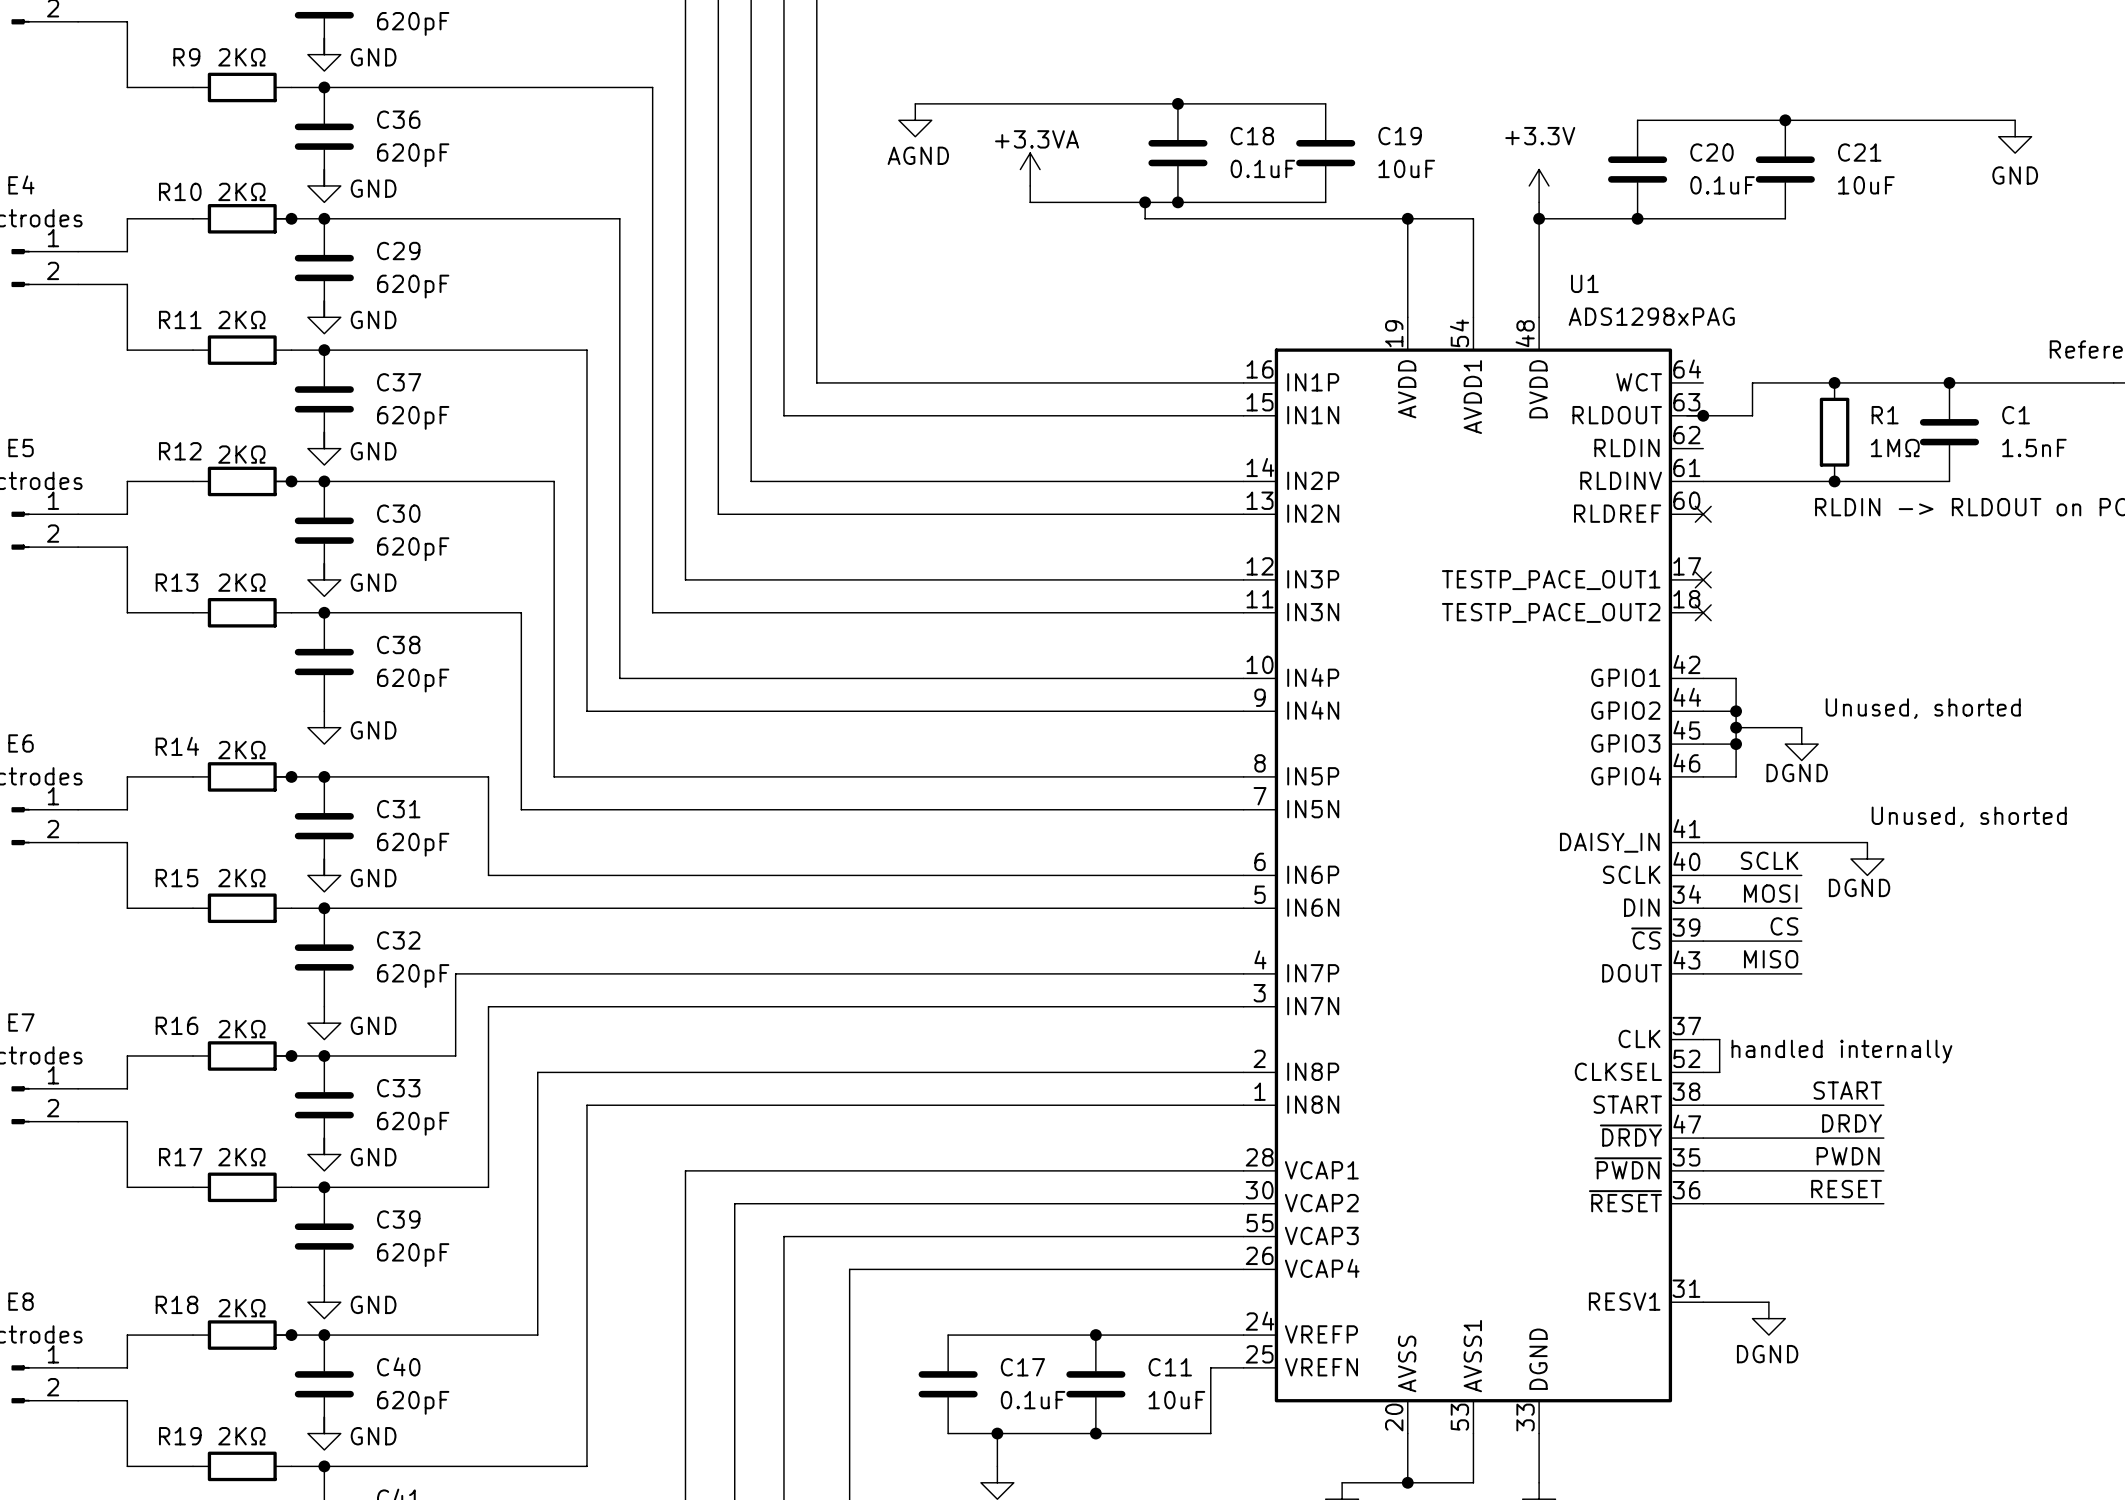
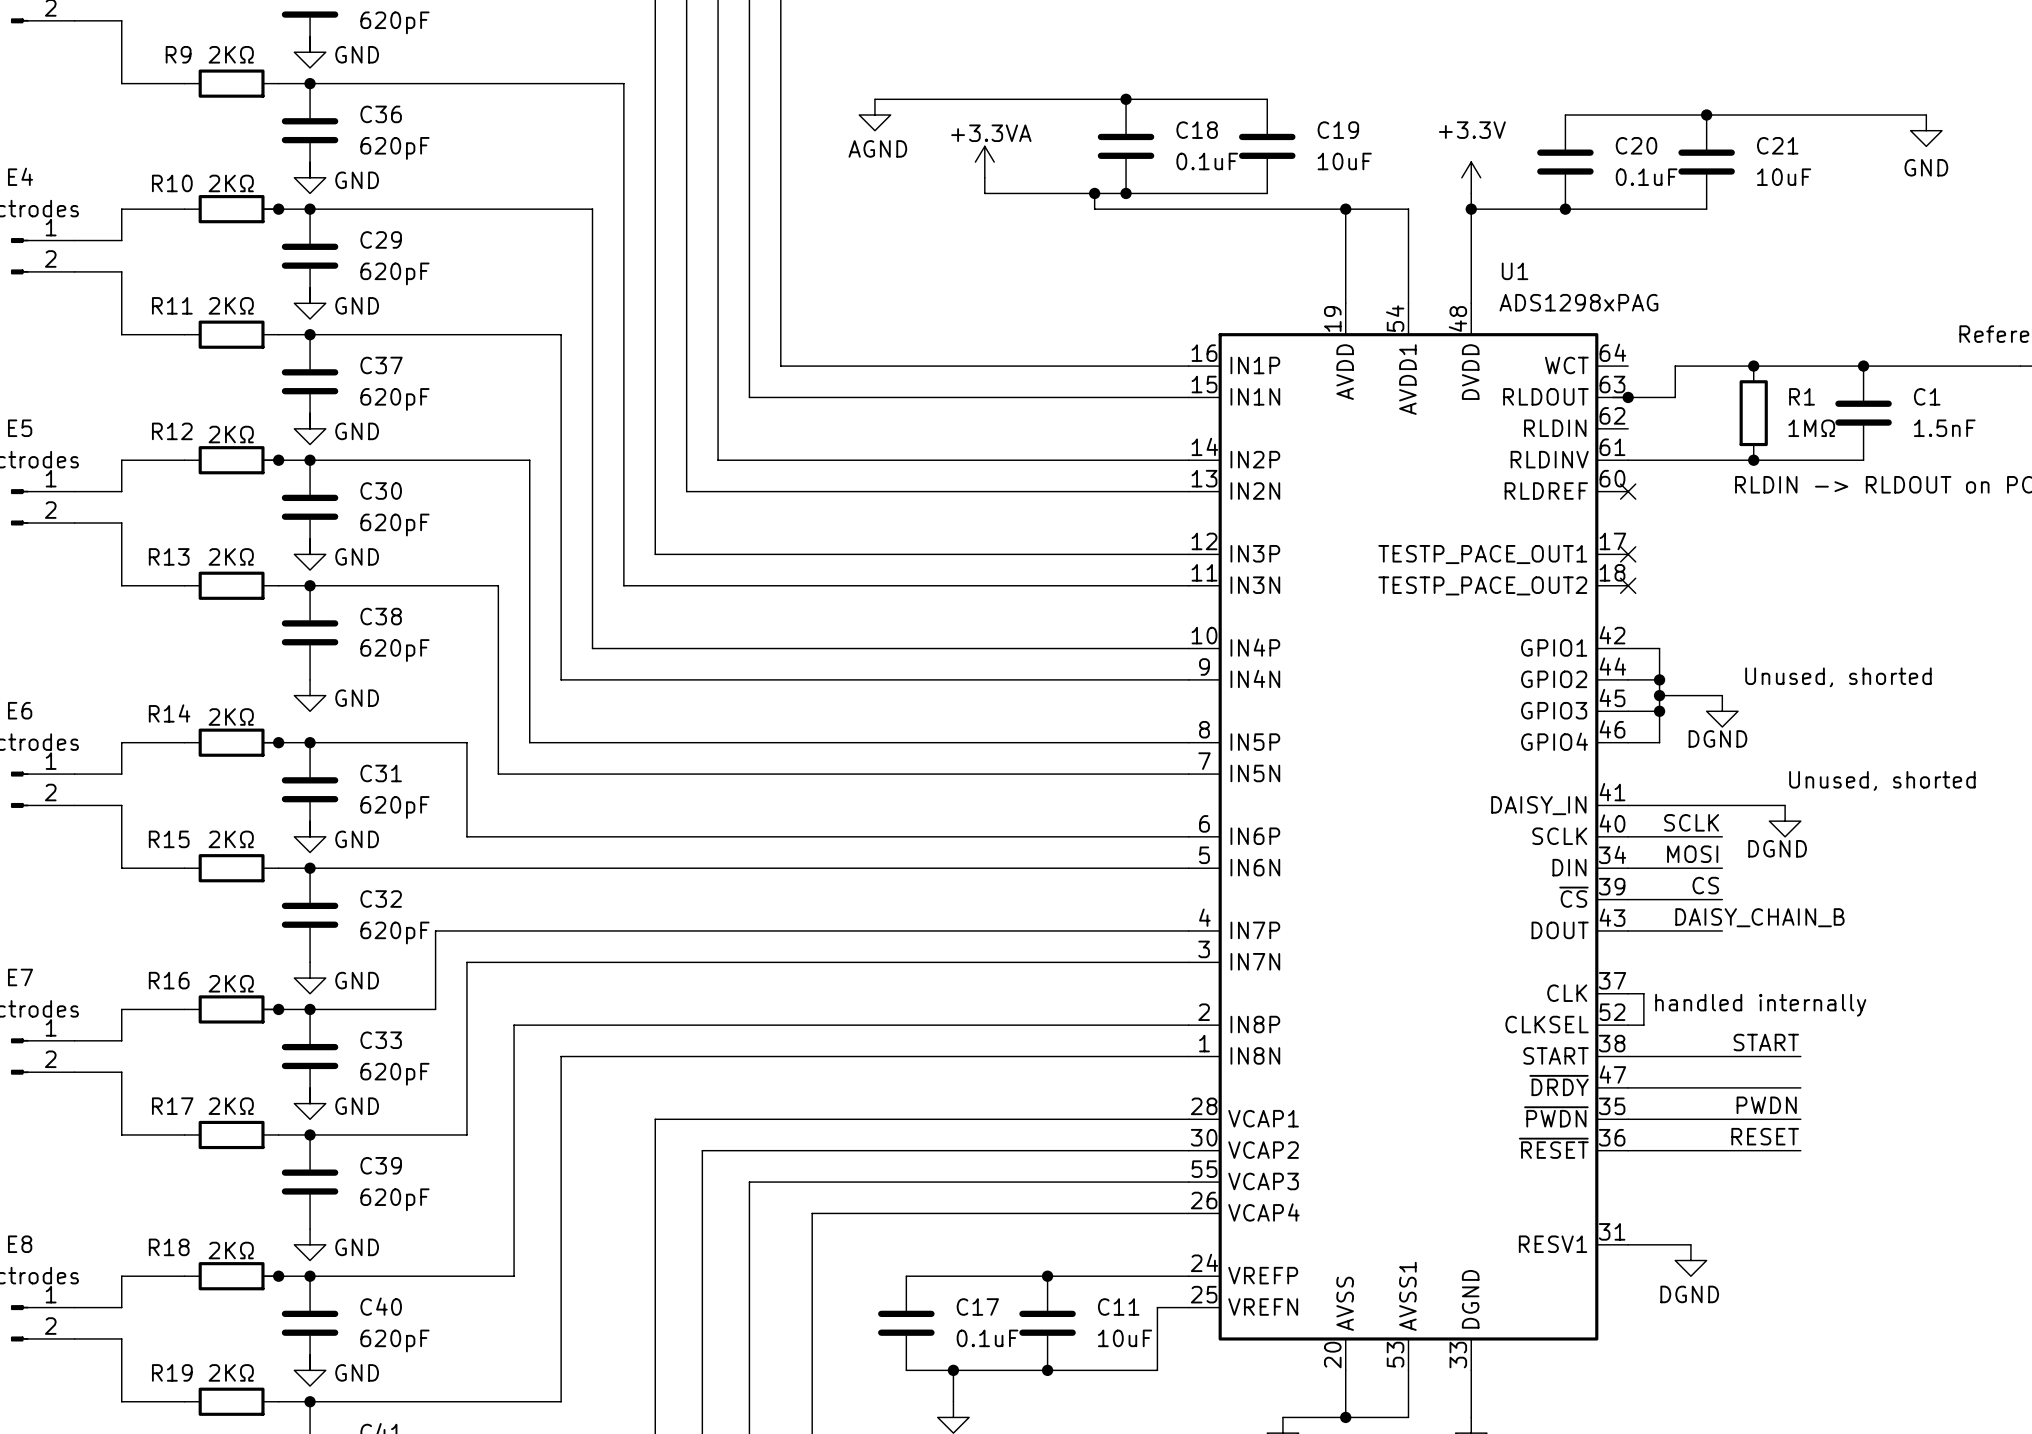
label: MISO (1771, 959) -> none
label: none -> DAISY_CHAIN_B (1759, 917)
label: DRDY (1852, 1123) -> none

